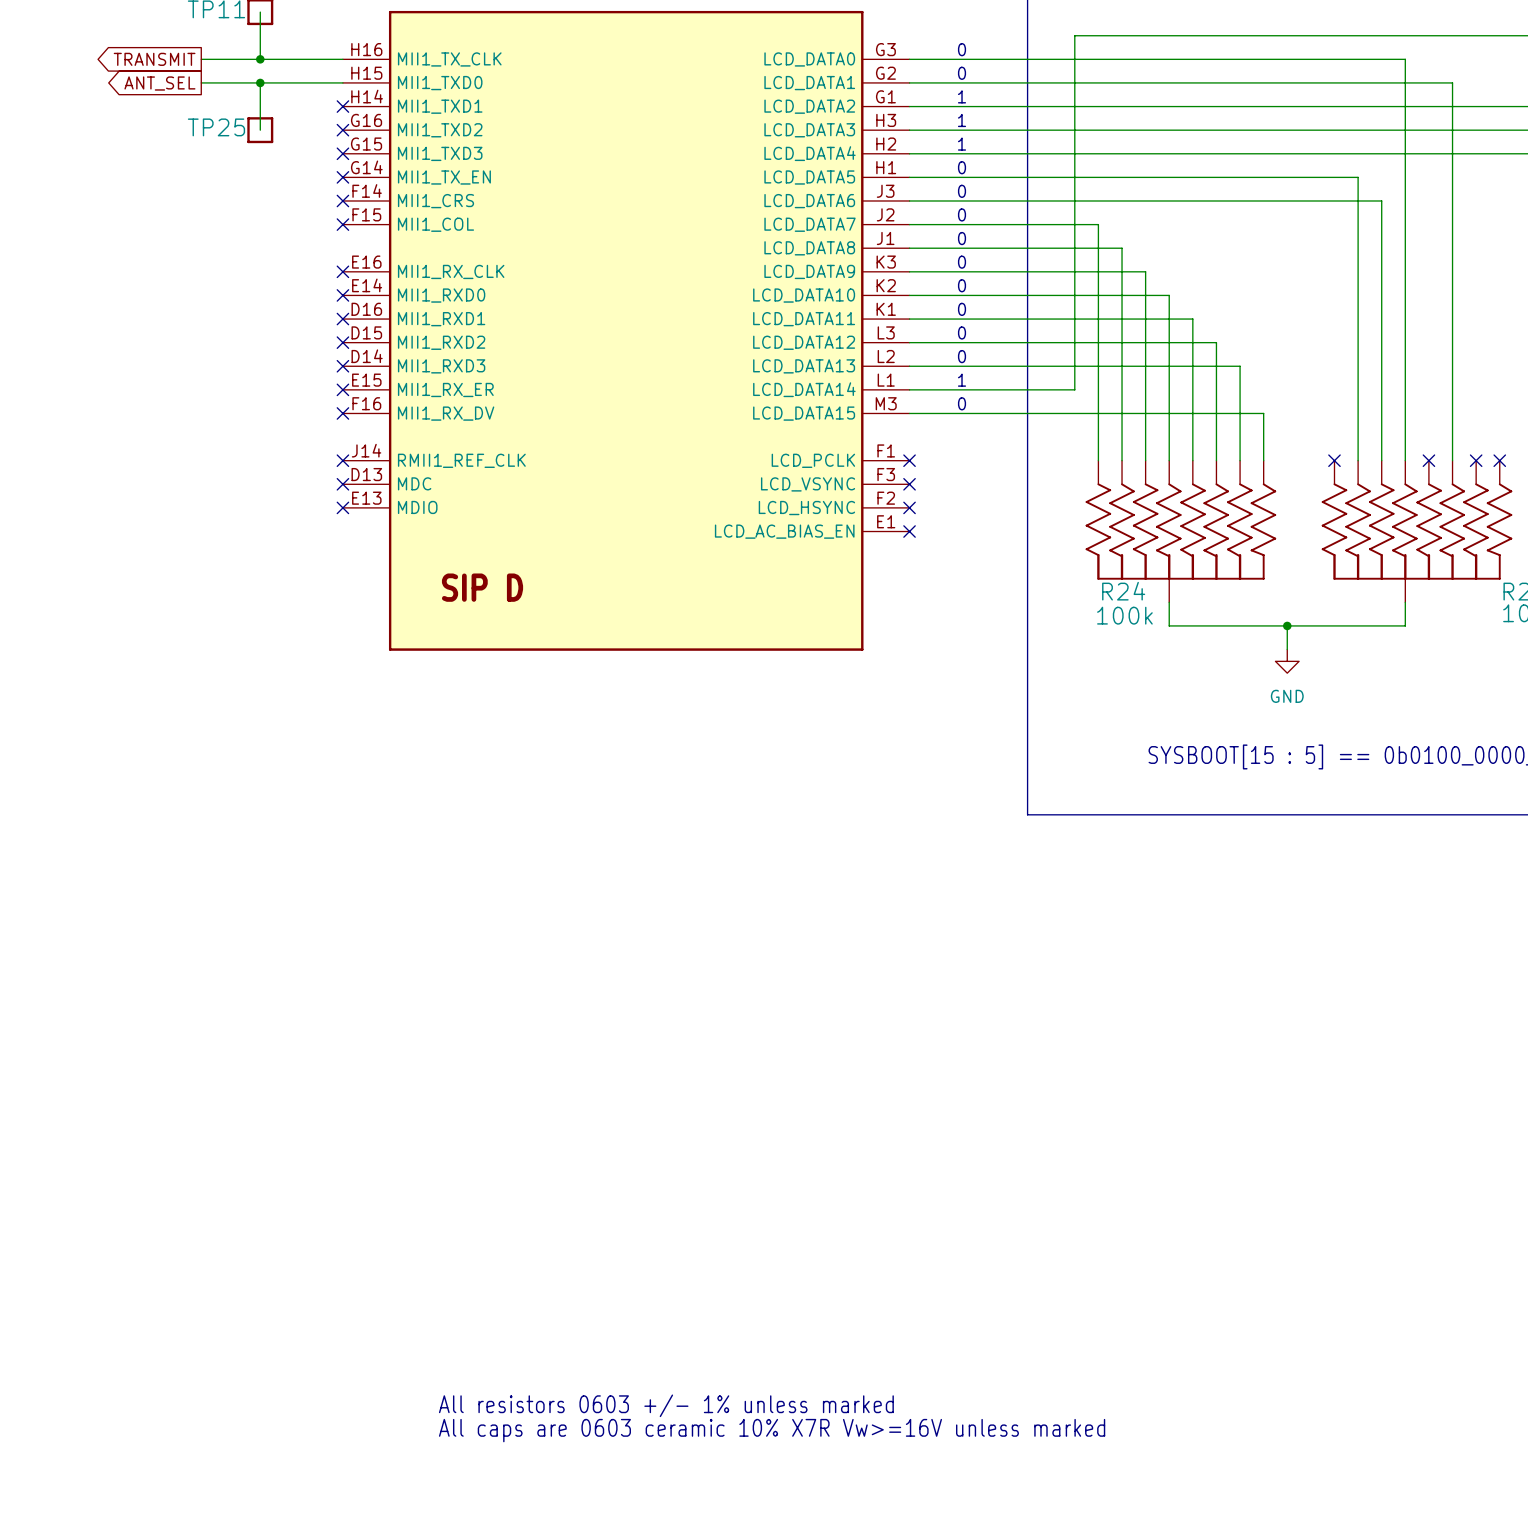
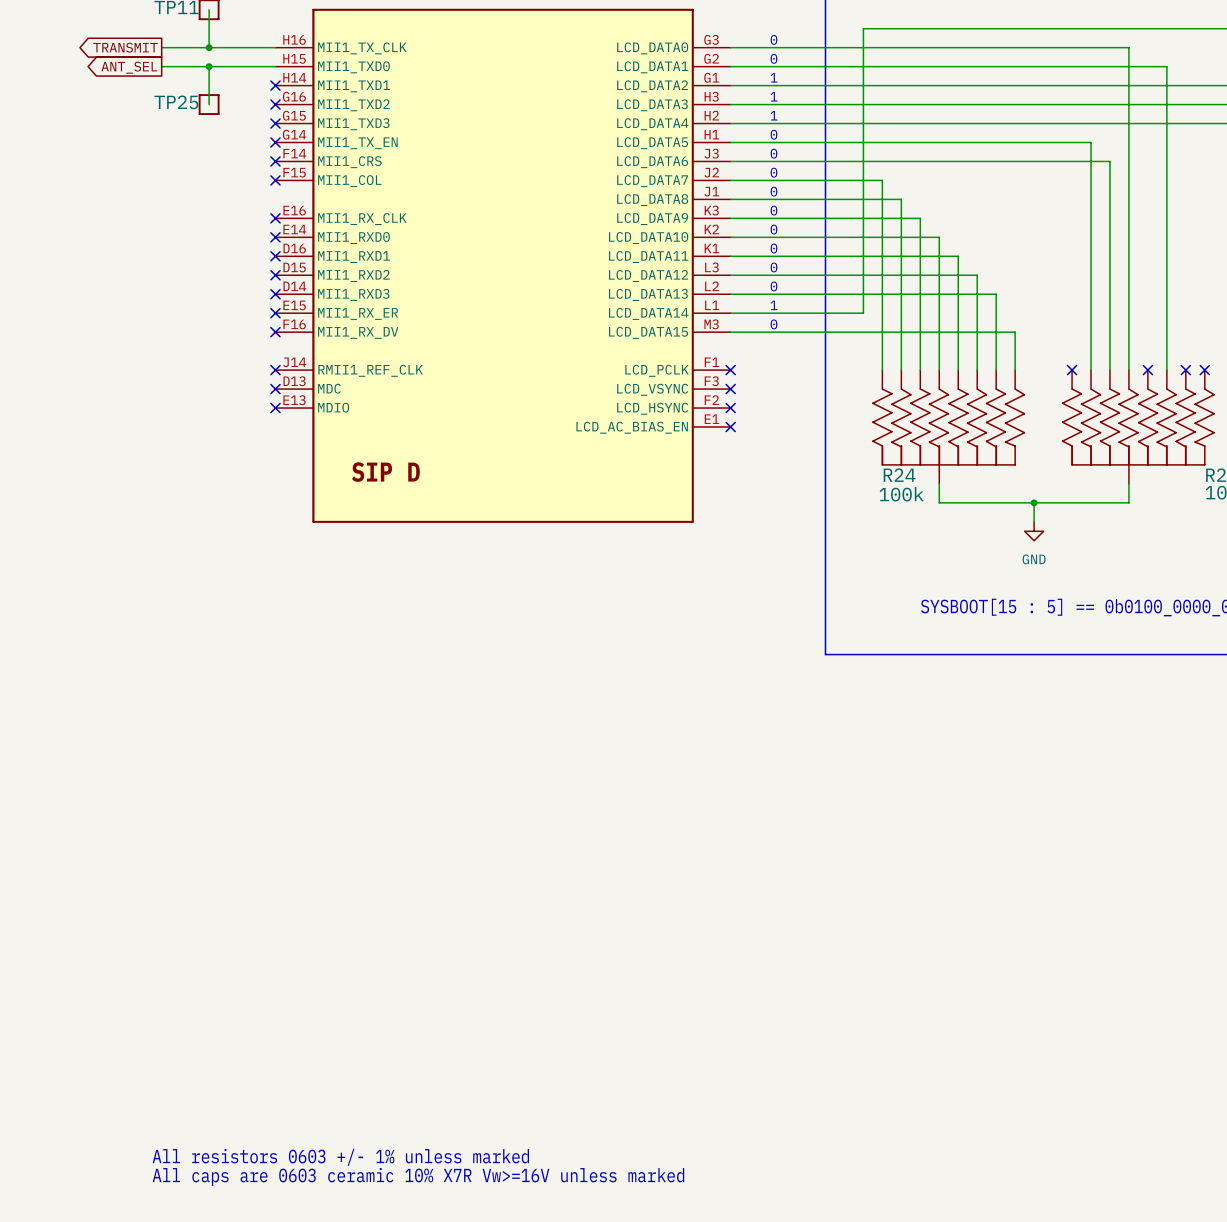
text: All resistors 0603 +/- 1% unless marked (666, 1405) -> none
text: All caps are 0603 ceramic 10% X7R Vw>=16V unless marked (772, 1430) -> none
text: none -> All resistors 0603 +/- 1% unless marked (340, 1157)
text: none -> All caps are 0603 ceramic 10% X7R Vw>=16V unless marked (418, 1176)

